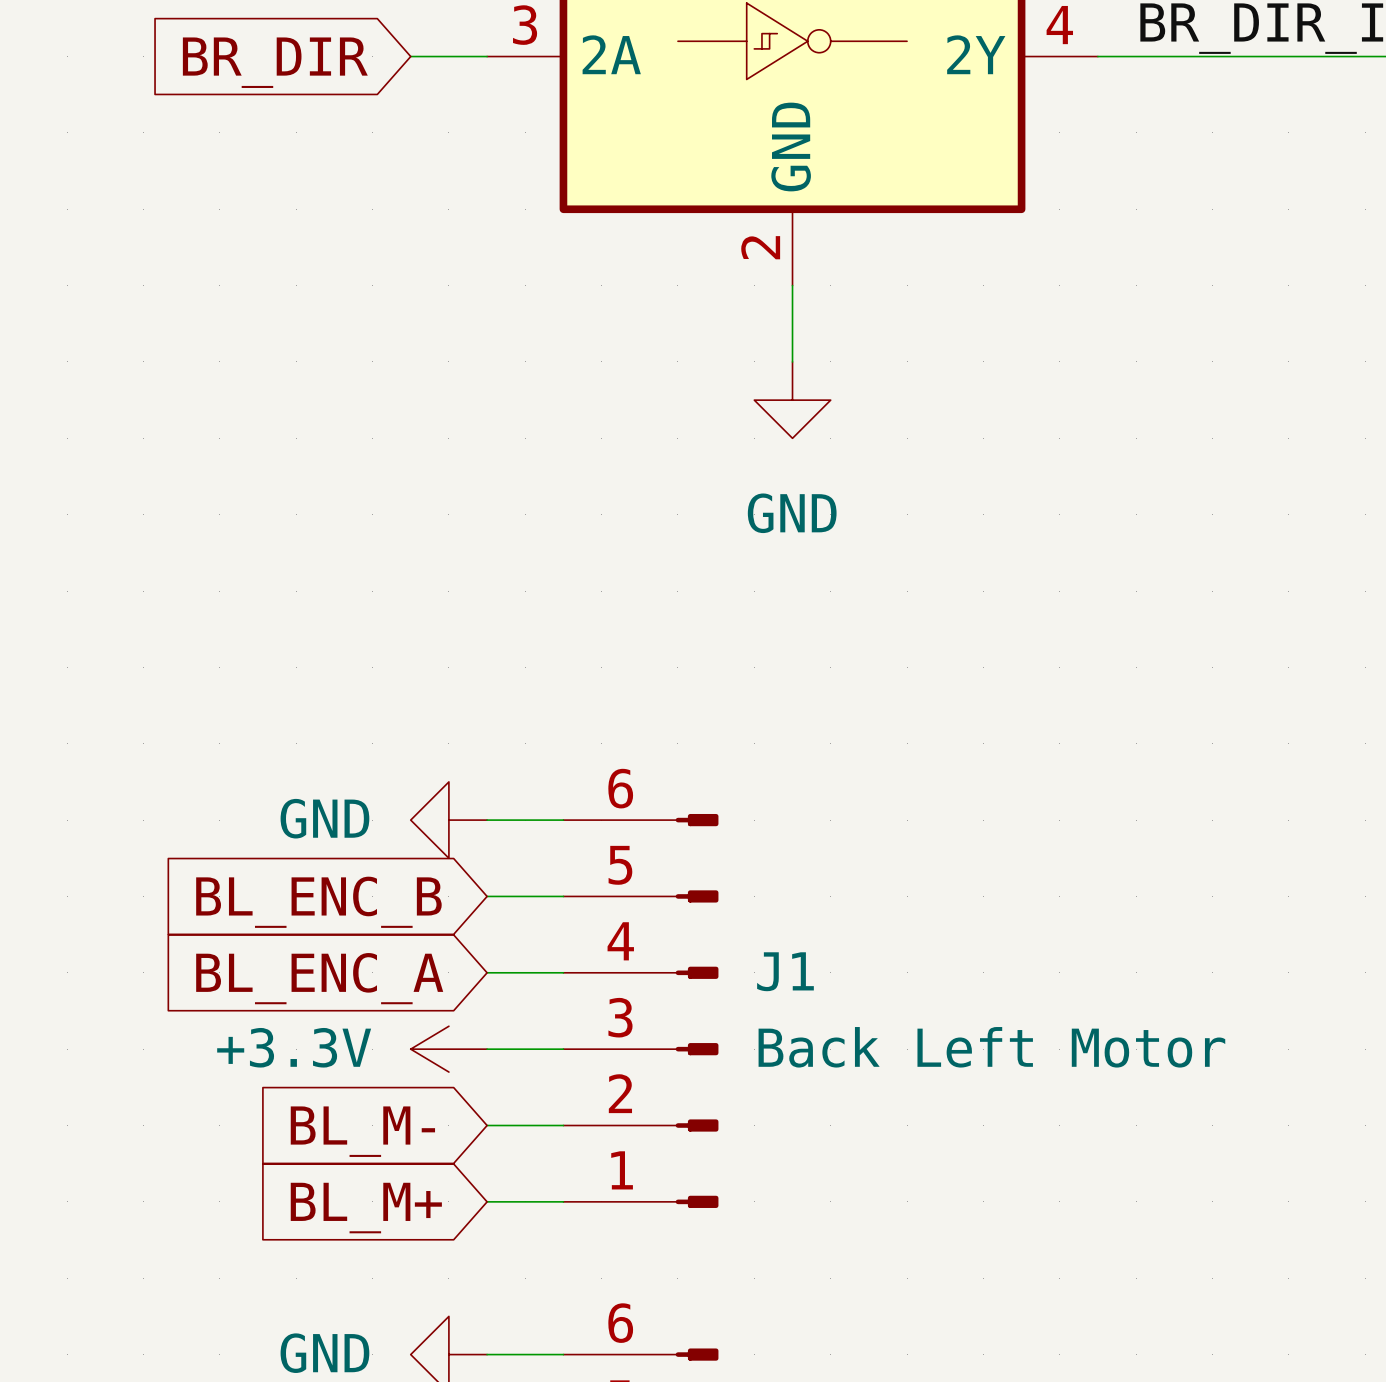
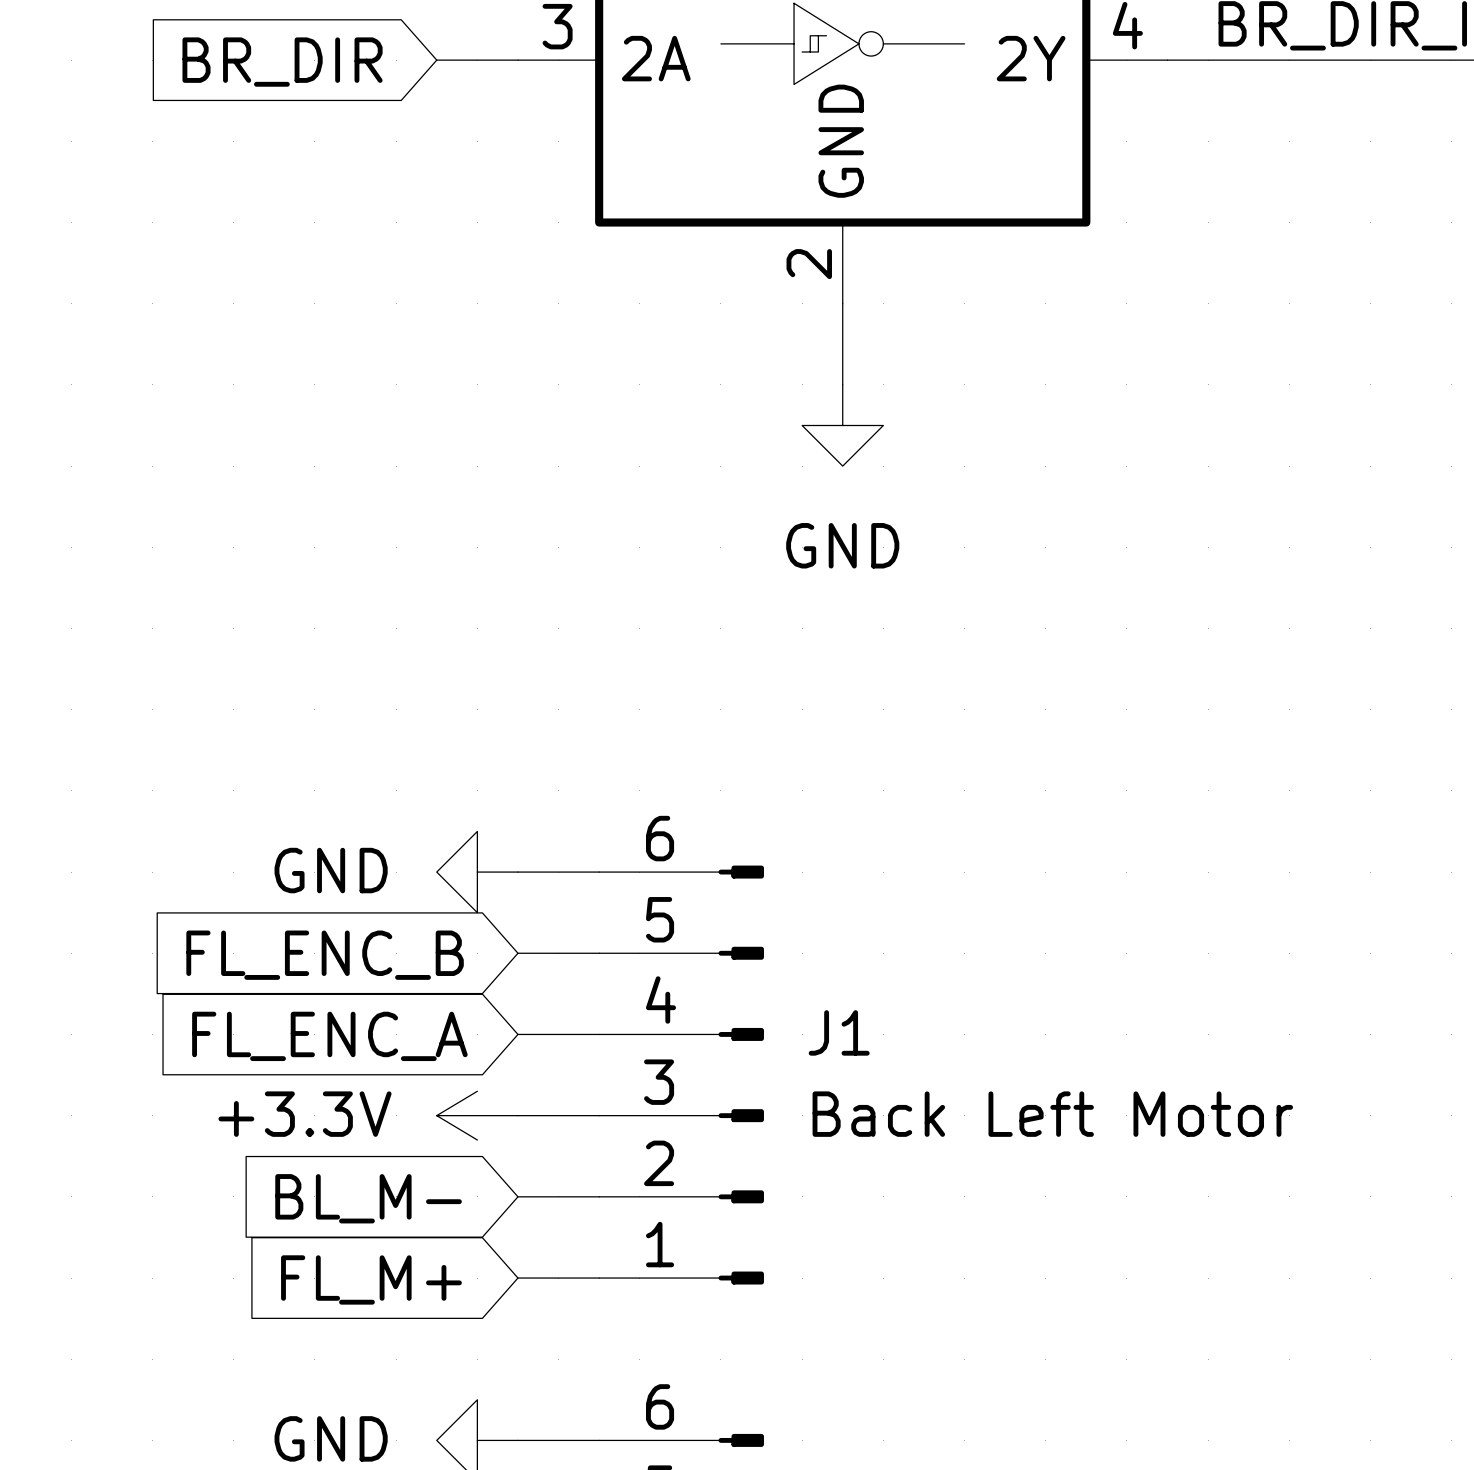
global label: BL_ENC_B (318, 902) -> FL_ENC_B (325, 955)
global label: BL_ENC_A (319, 978) -> FL_ENC_A (329, 1036)
global label: BL_M+ (366, 1208) -> FL_M+ (371, 1279)

